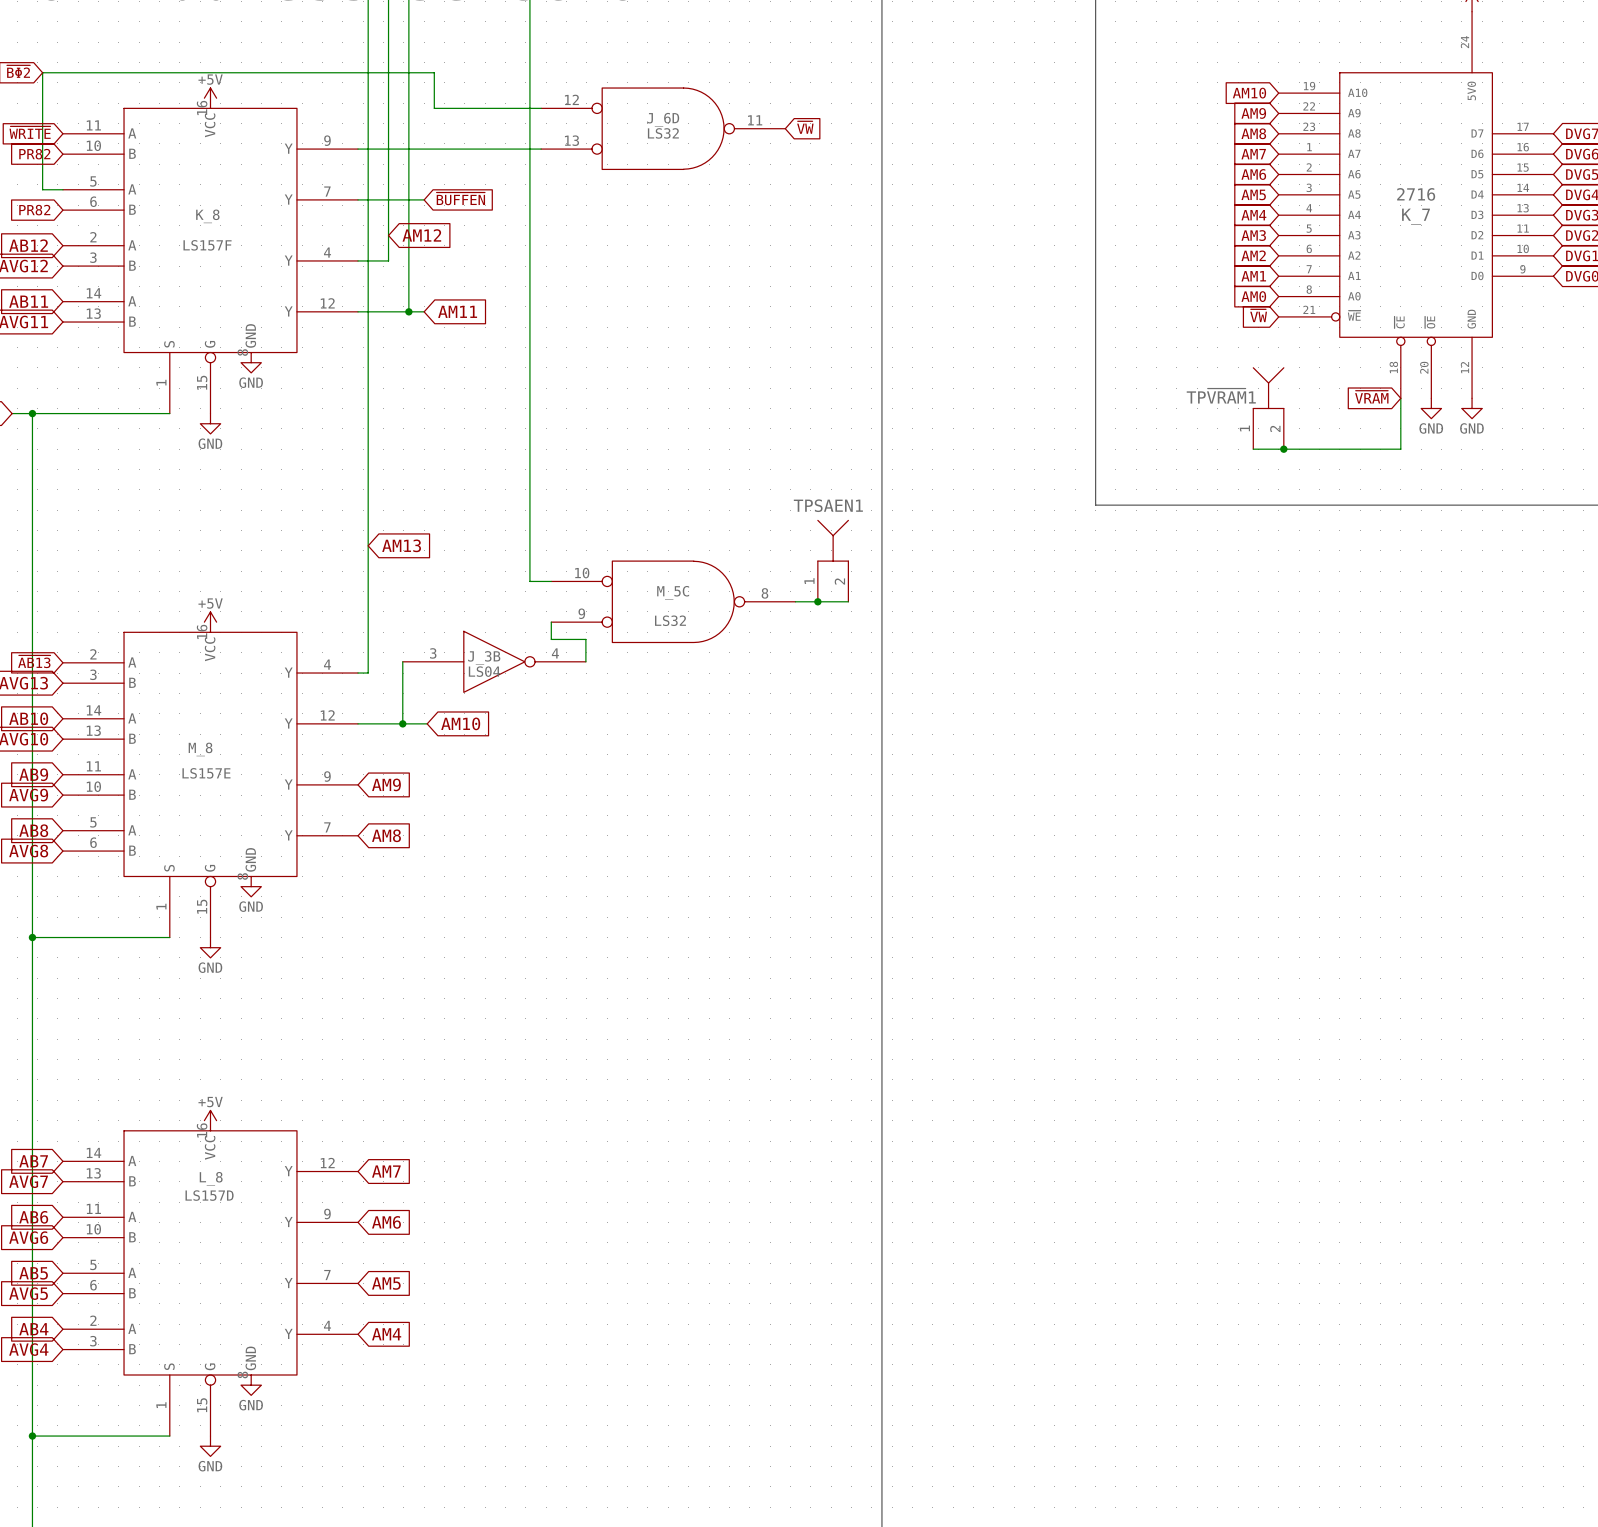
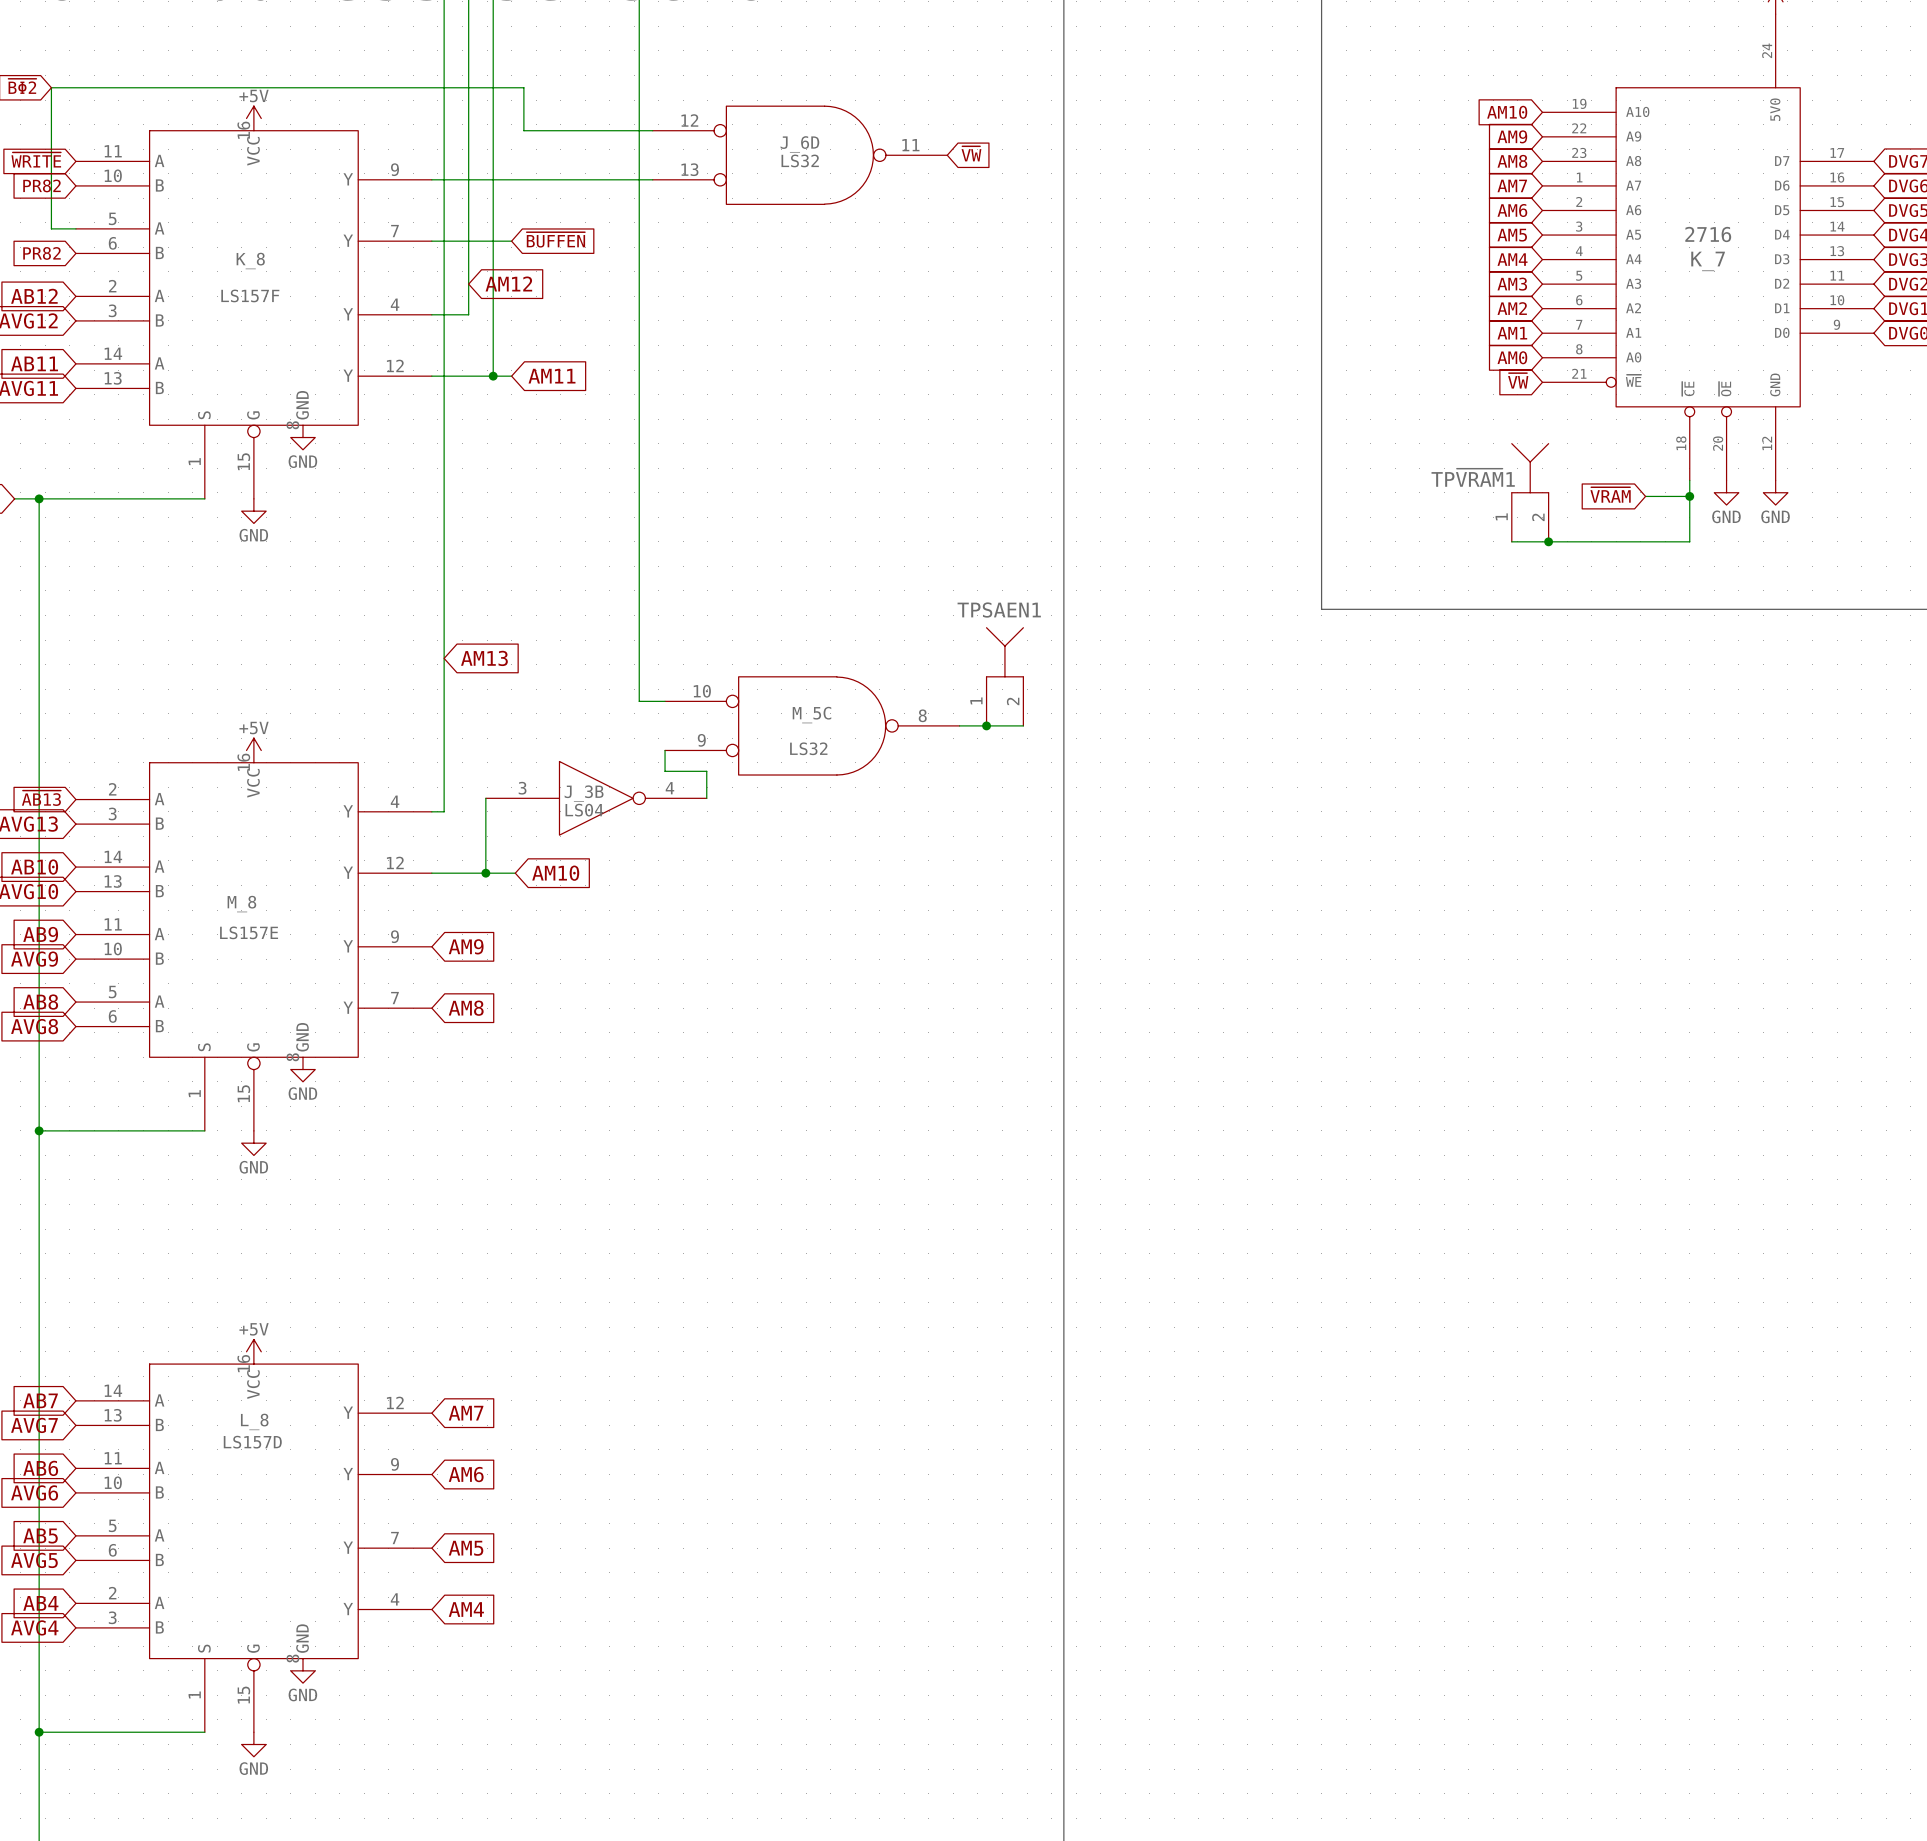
global label position: ~{VRAM} (1371, 397) -> ~{VRAM} (1610, 494)
wire: none -> (1645, 496) (1689, 496)
junction: none -> (1689, 496)

